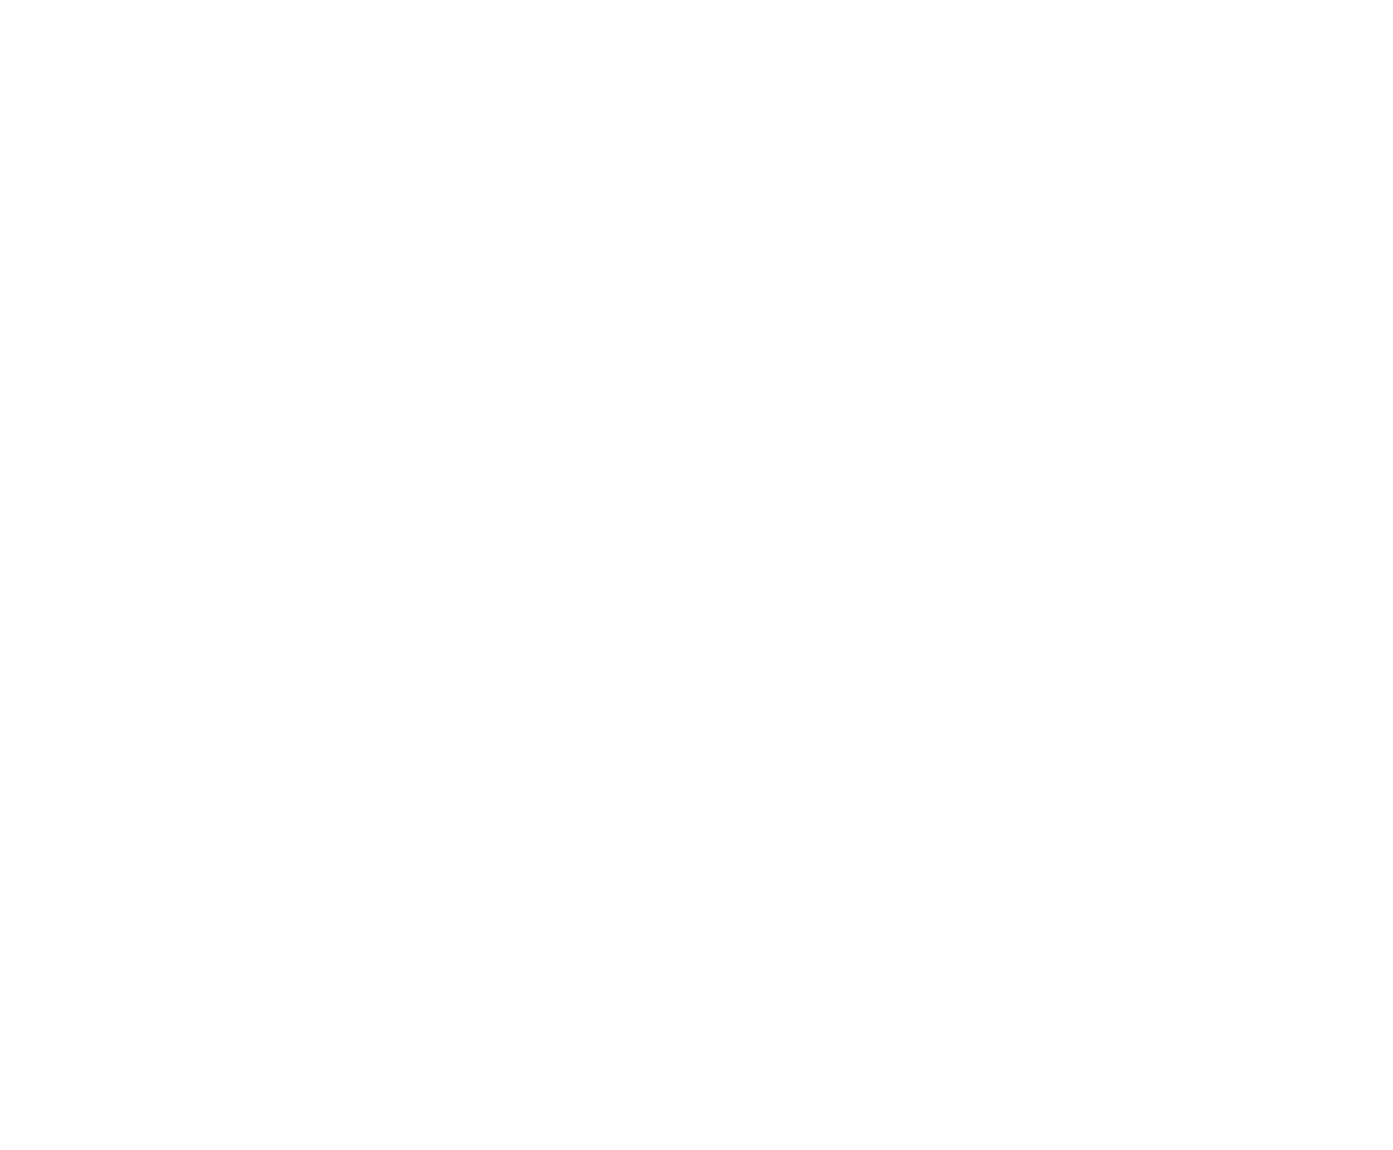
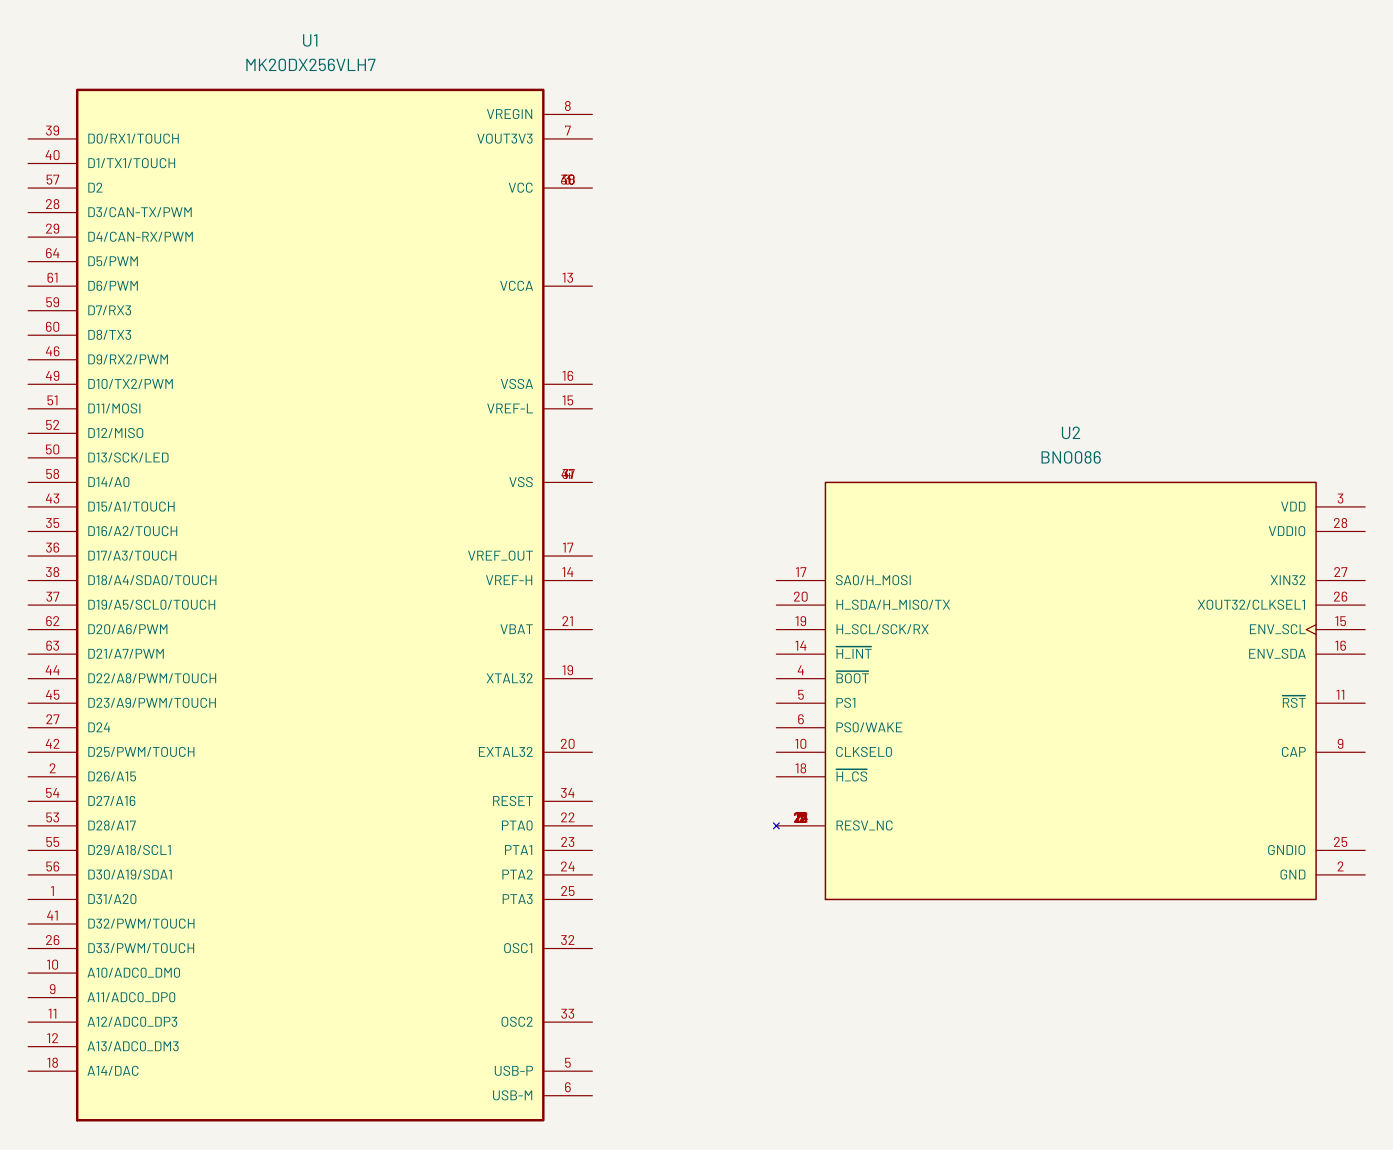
U1: none -> MK20DX256VLH7 (310, 605)
U2: none -> BNO086 (1069, 690)

